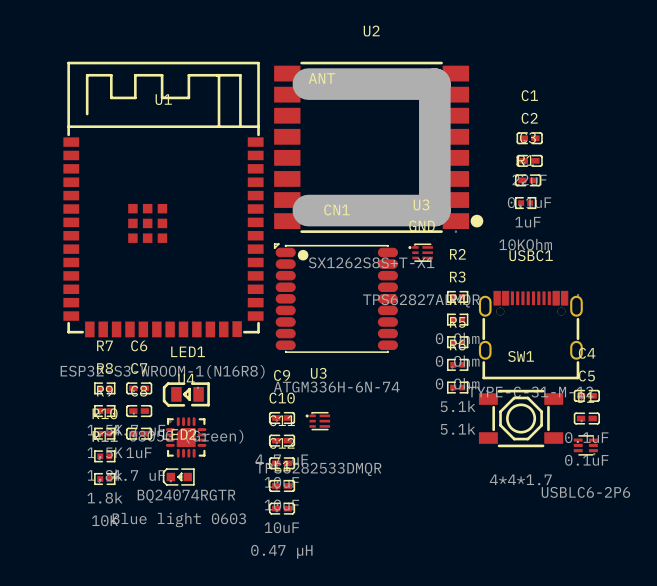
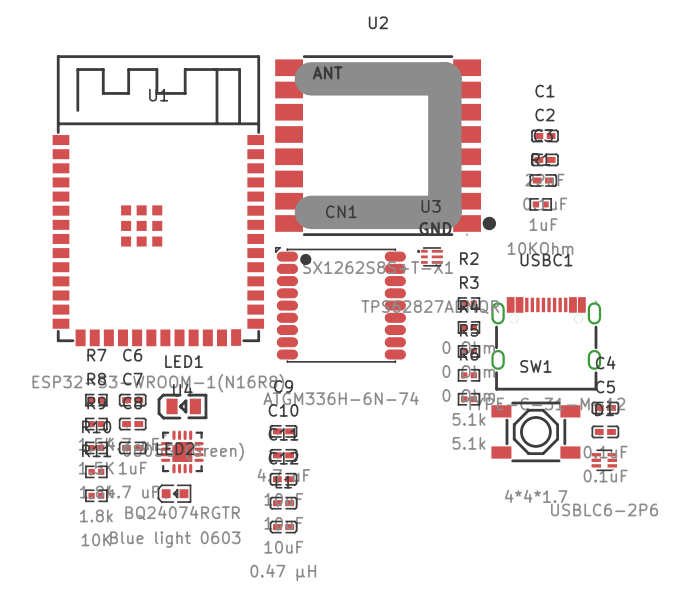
U3: TPS6282533DMQR (317, 421) -> none

